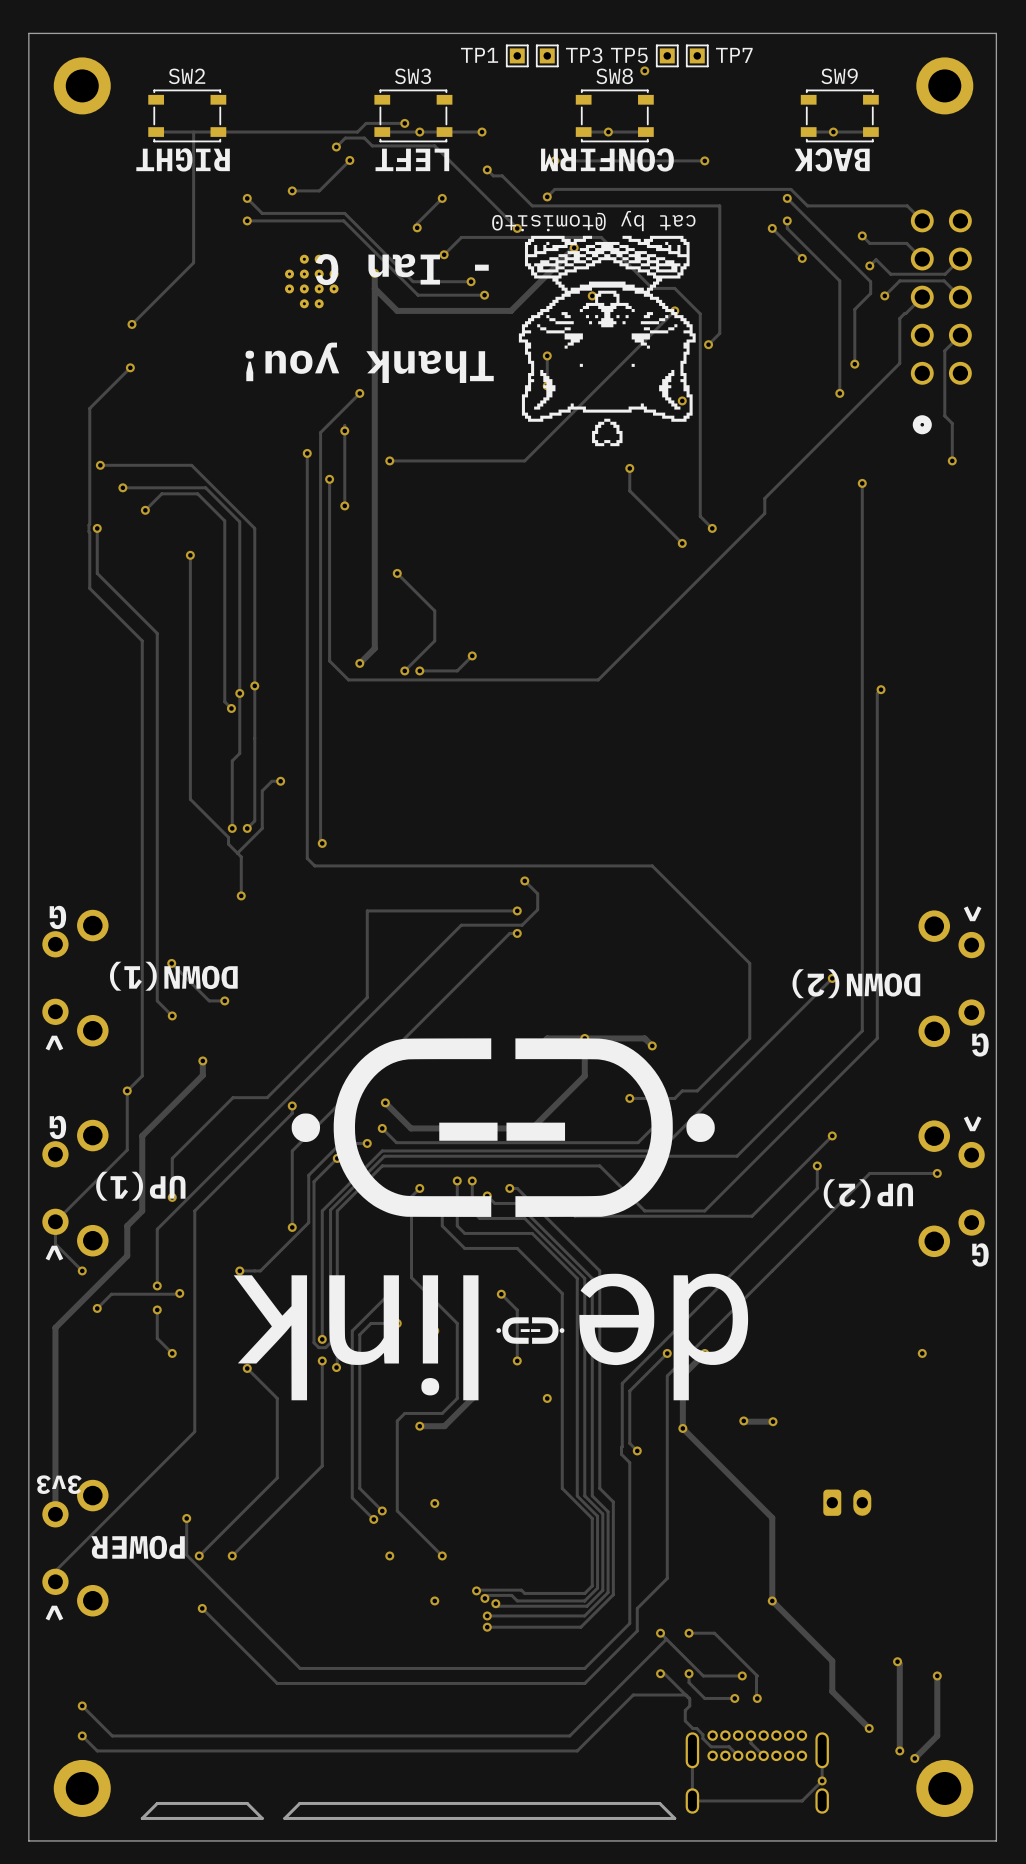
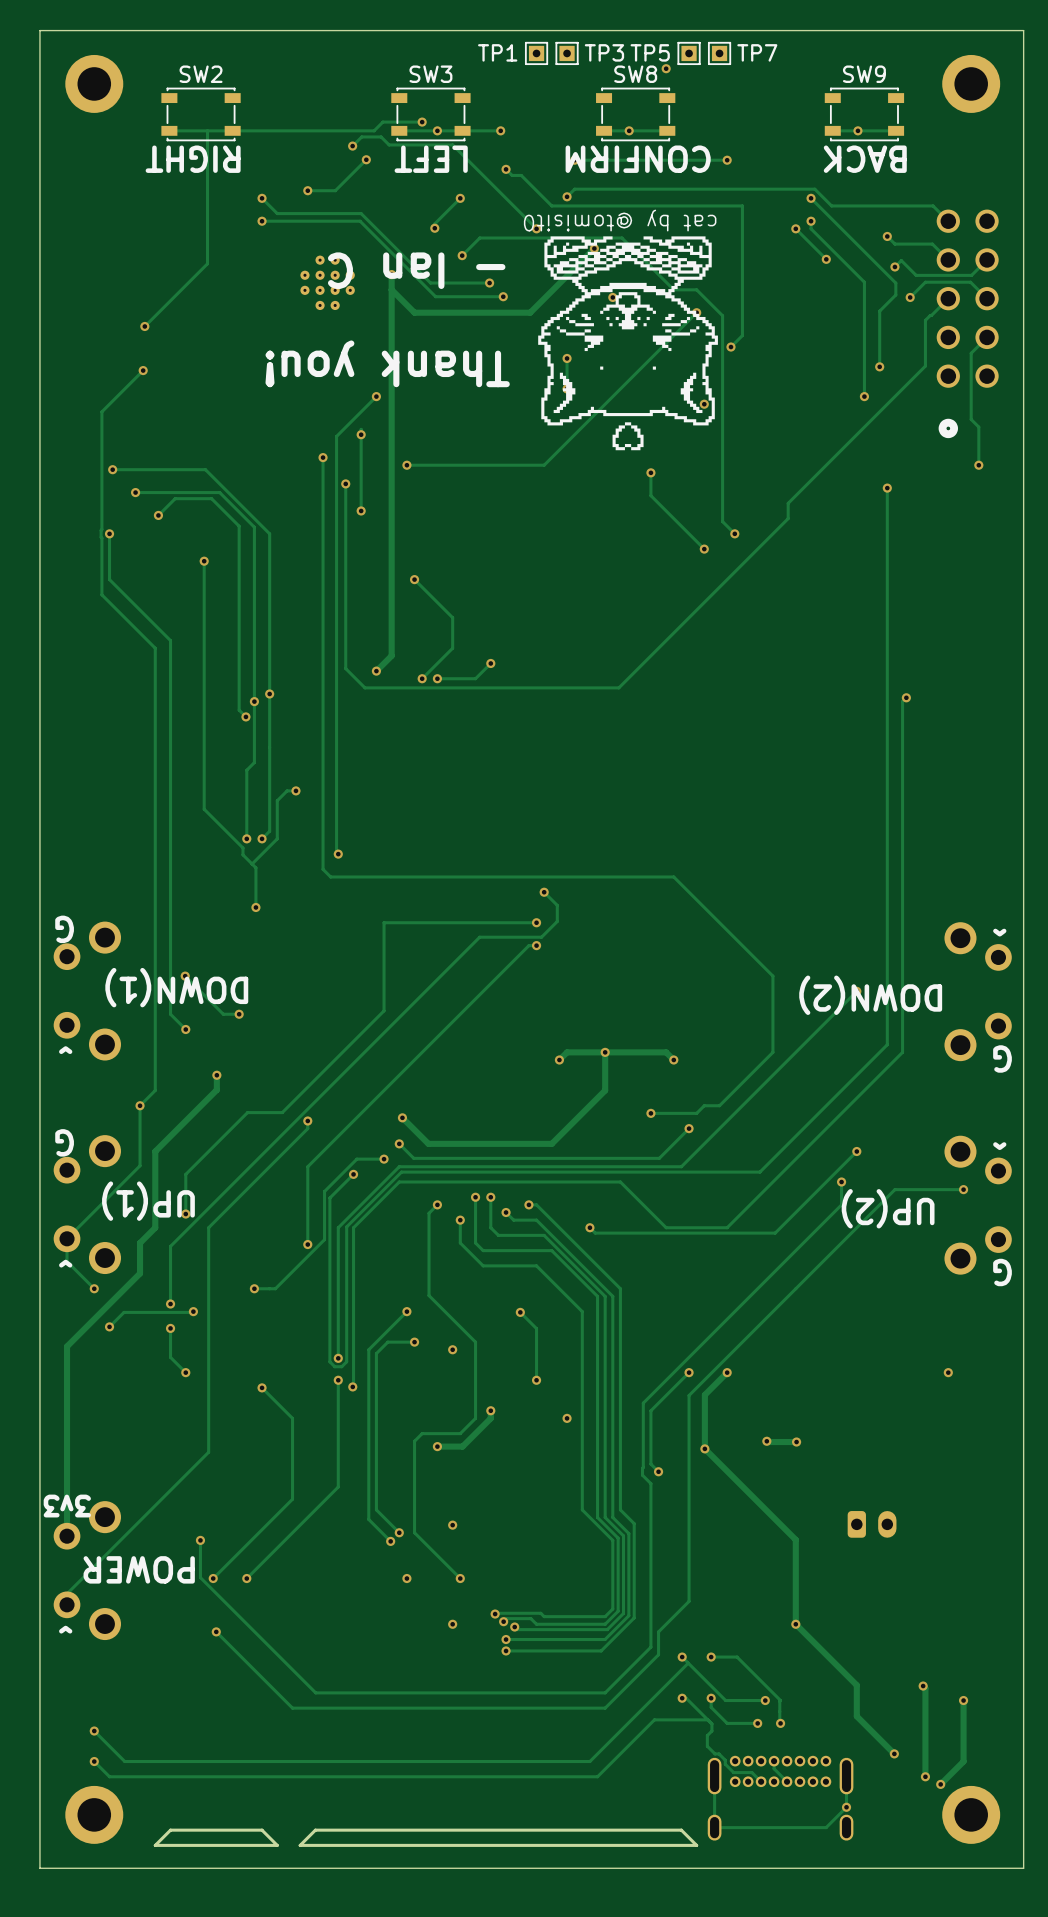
drawing: [291, 1038, 715, 1217] -> none
drawing: [233, 1273, 749, 1401] -> none

